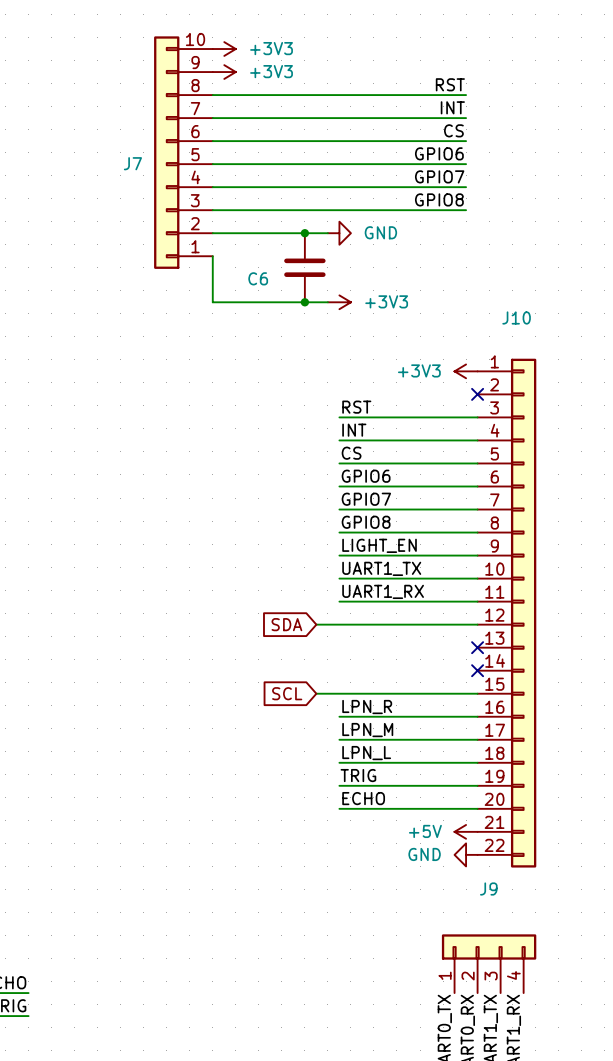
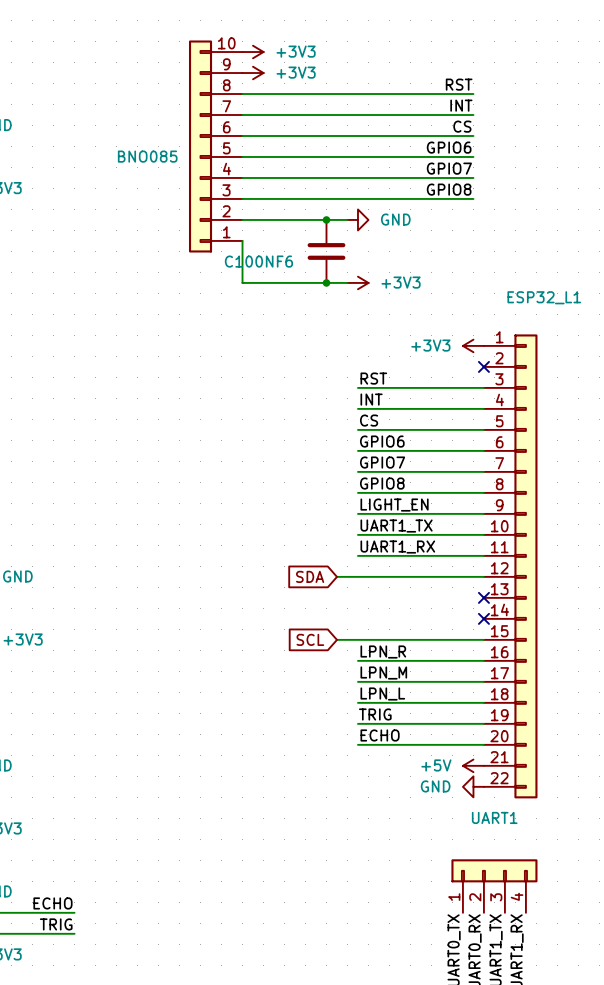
J7 name: J7 (132, 163) -> BNO085 (147, 156)
C6 name: C6 (258, 278) -> C100NF6 (258, 261)
J10 name: J10 (516, 317) -> ESP32_L1 (544, 297)
J9 name: J9 (488, 889) -> UART1 (494, 817)

